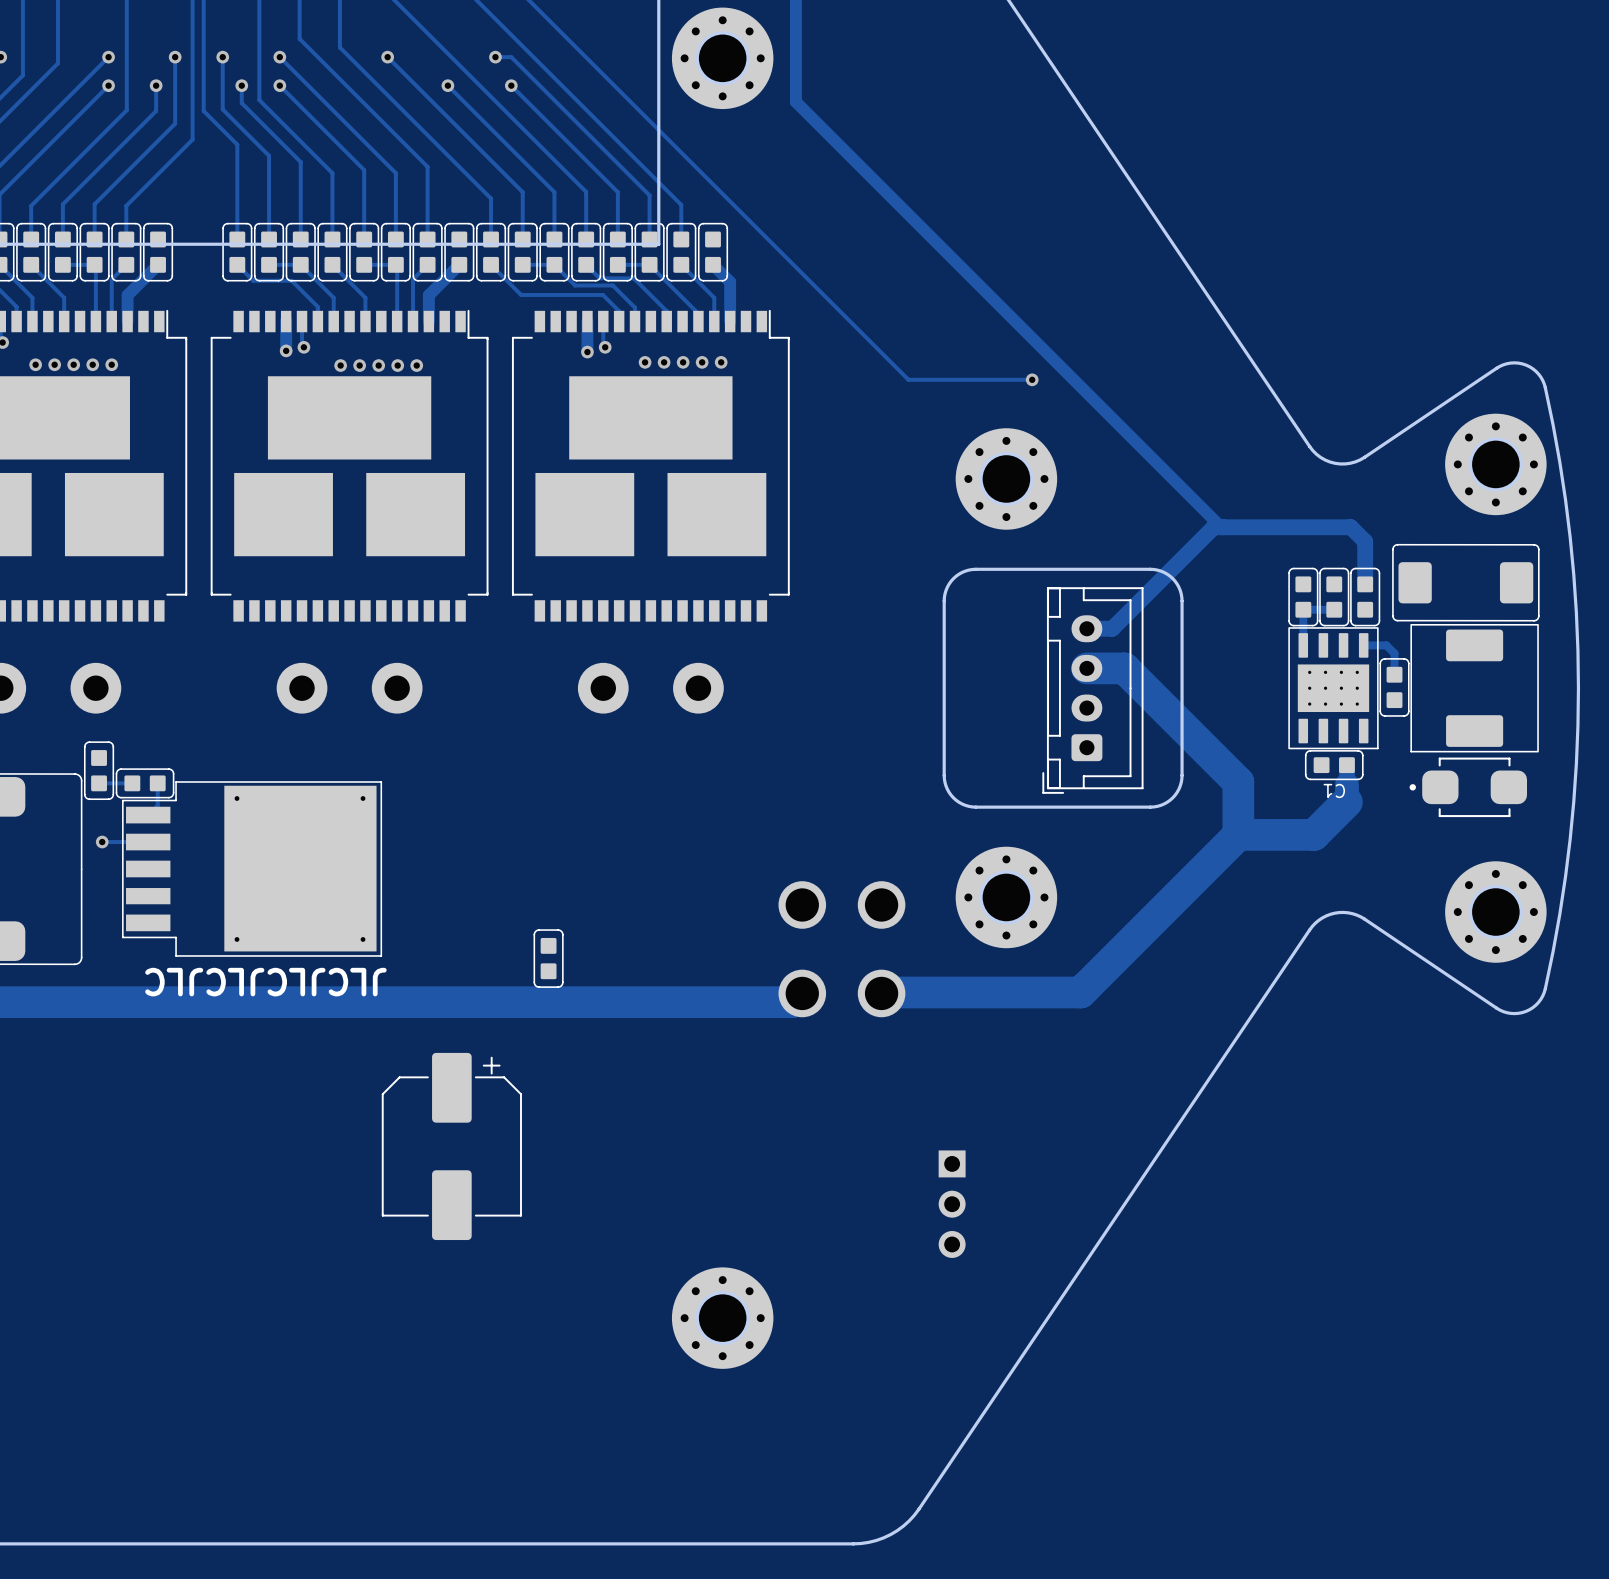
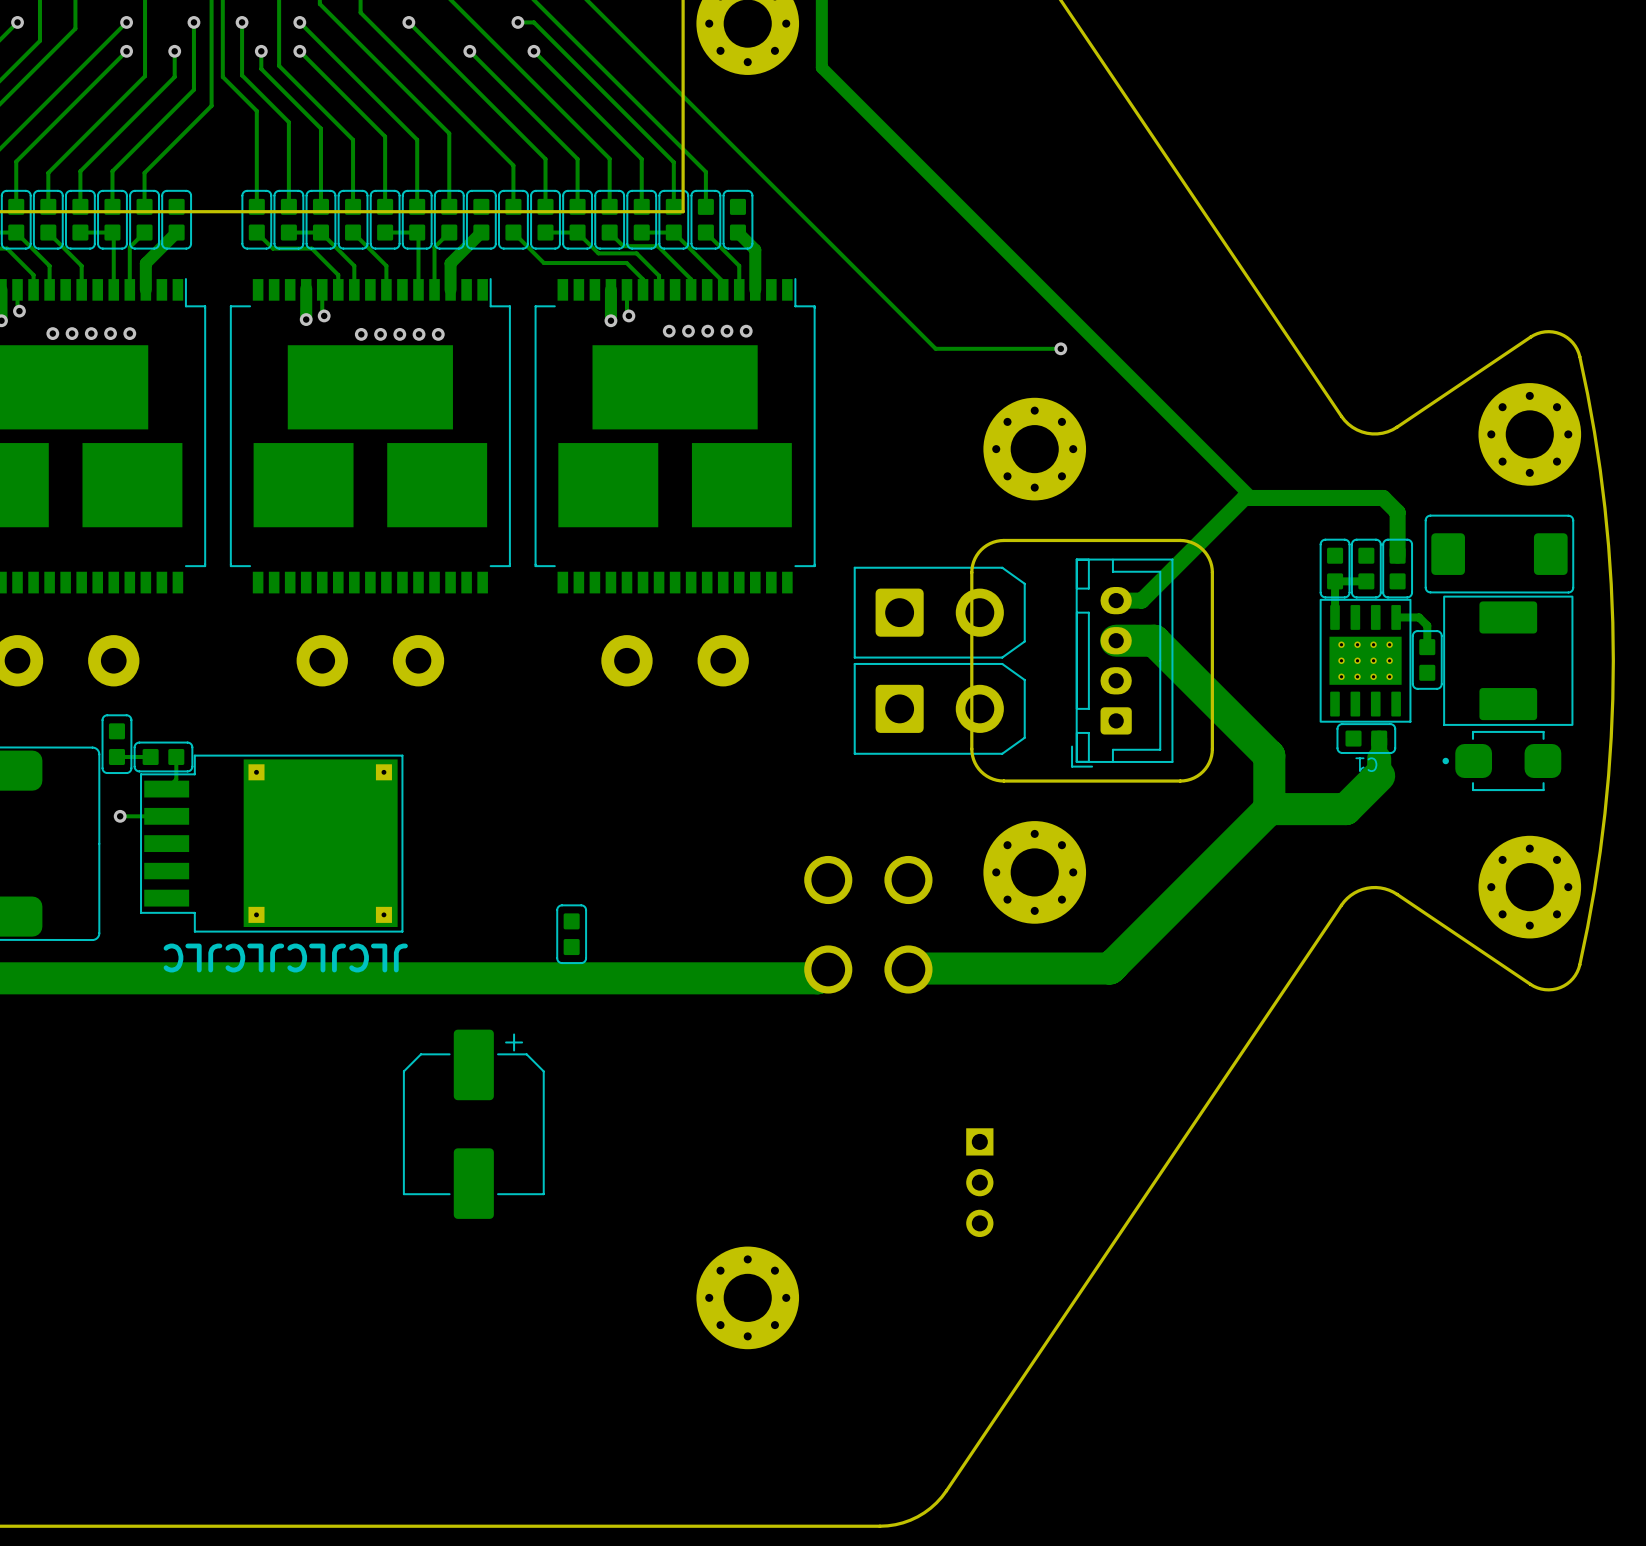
part: none -> (939, 612)
part: none -> (939, 708)

